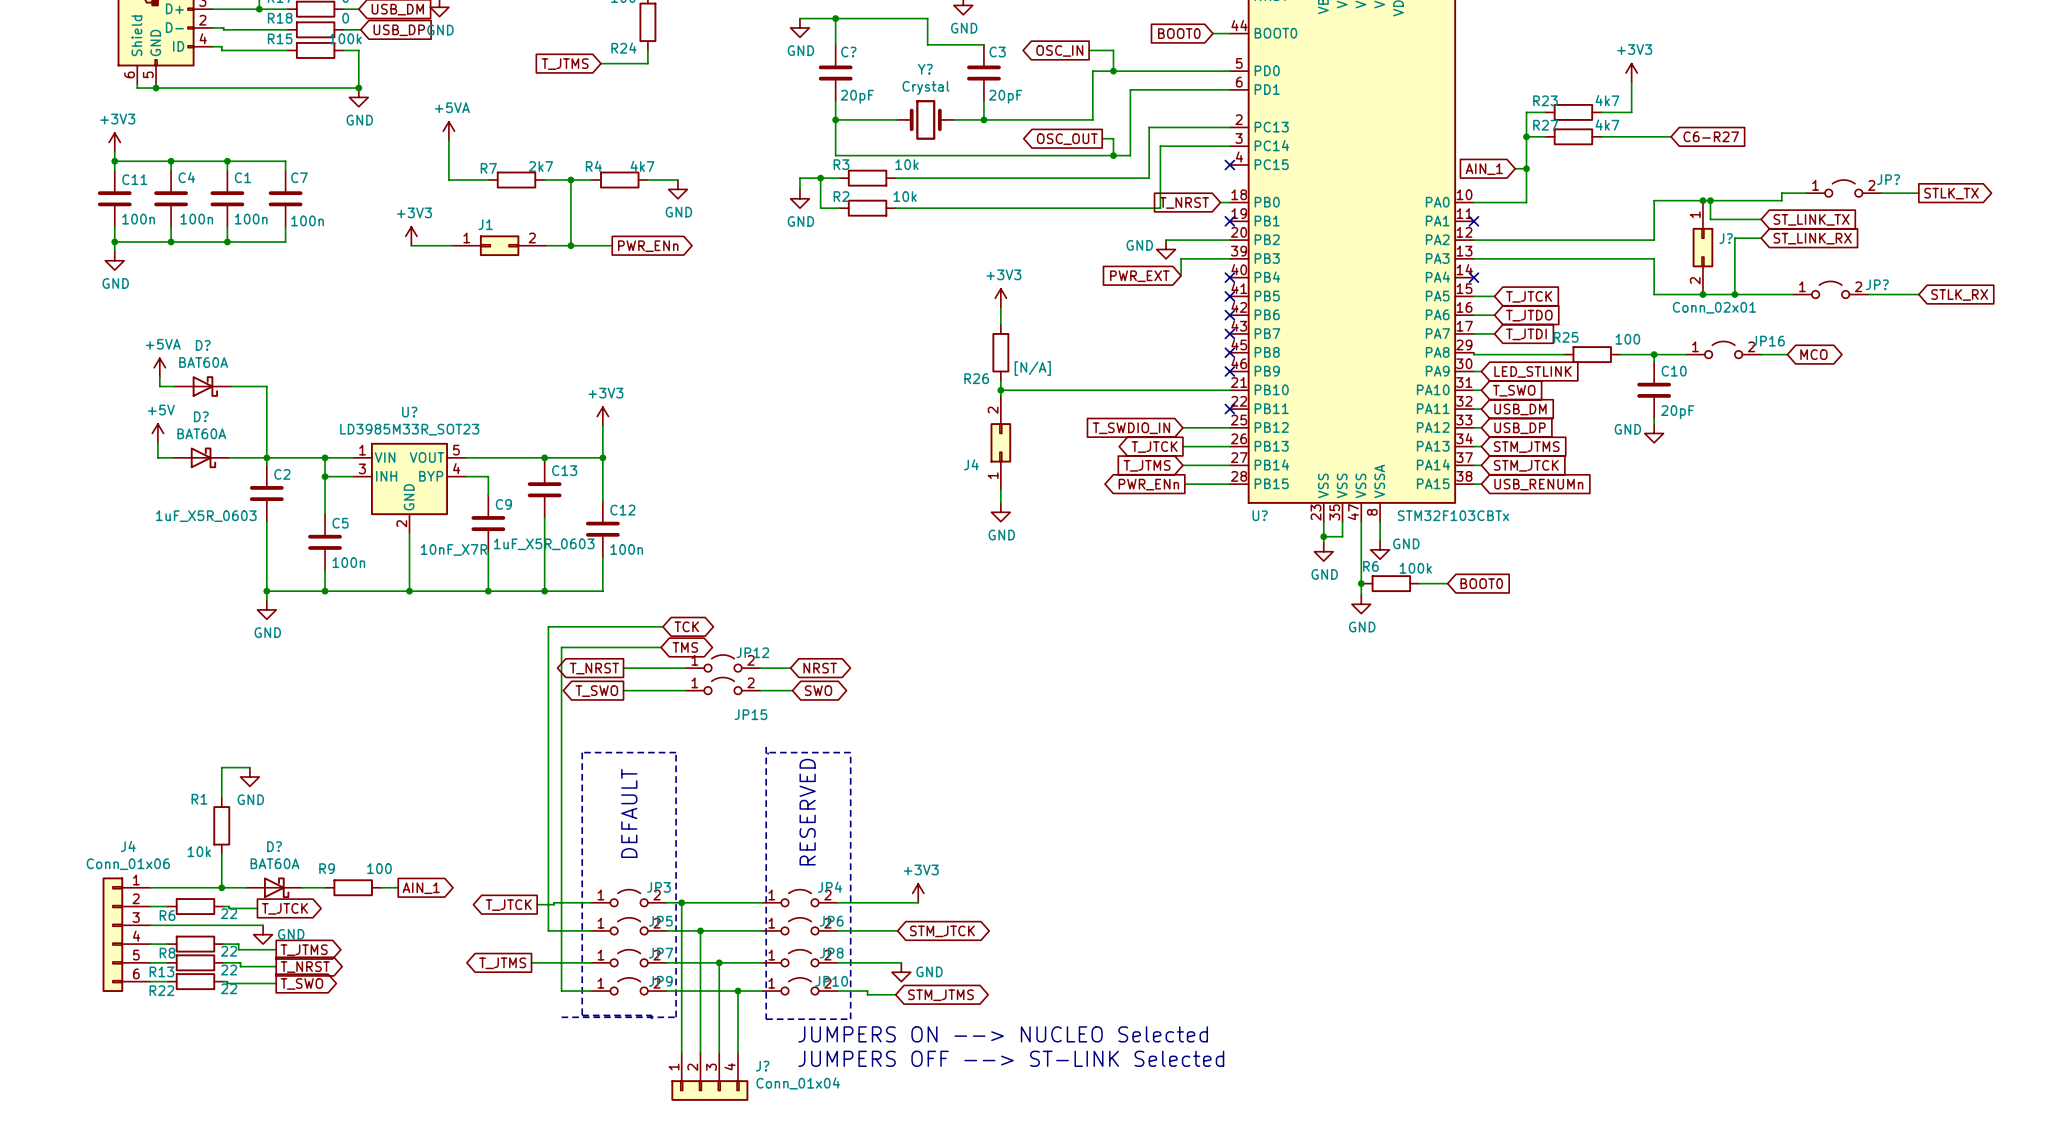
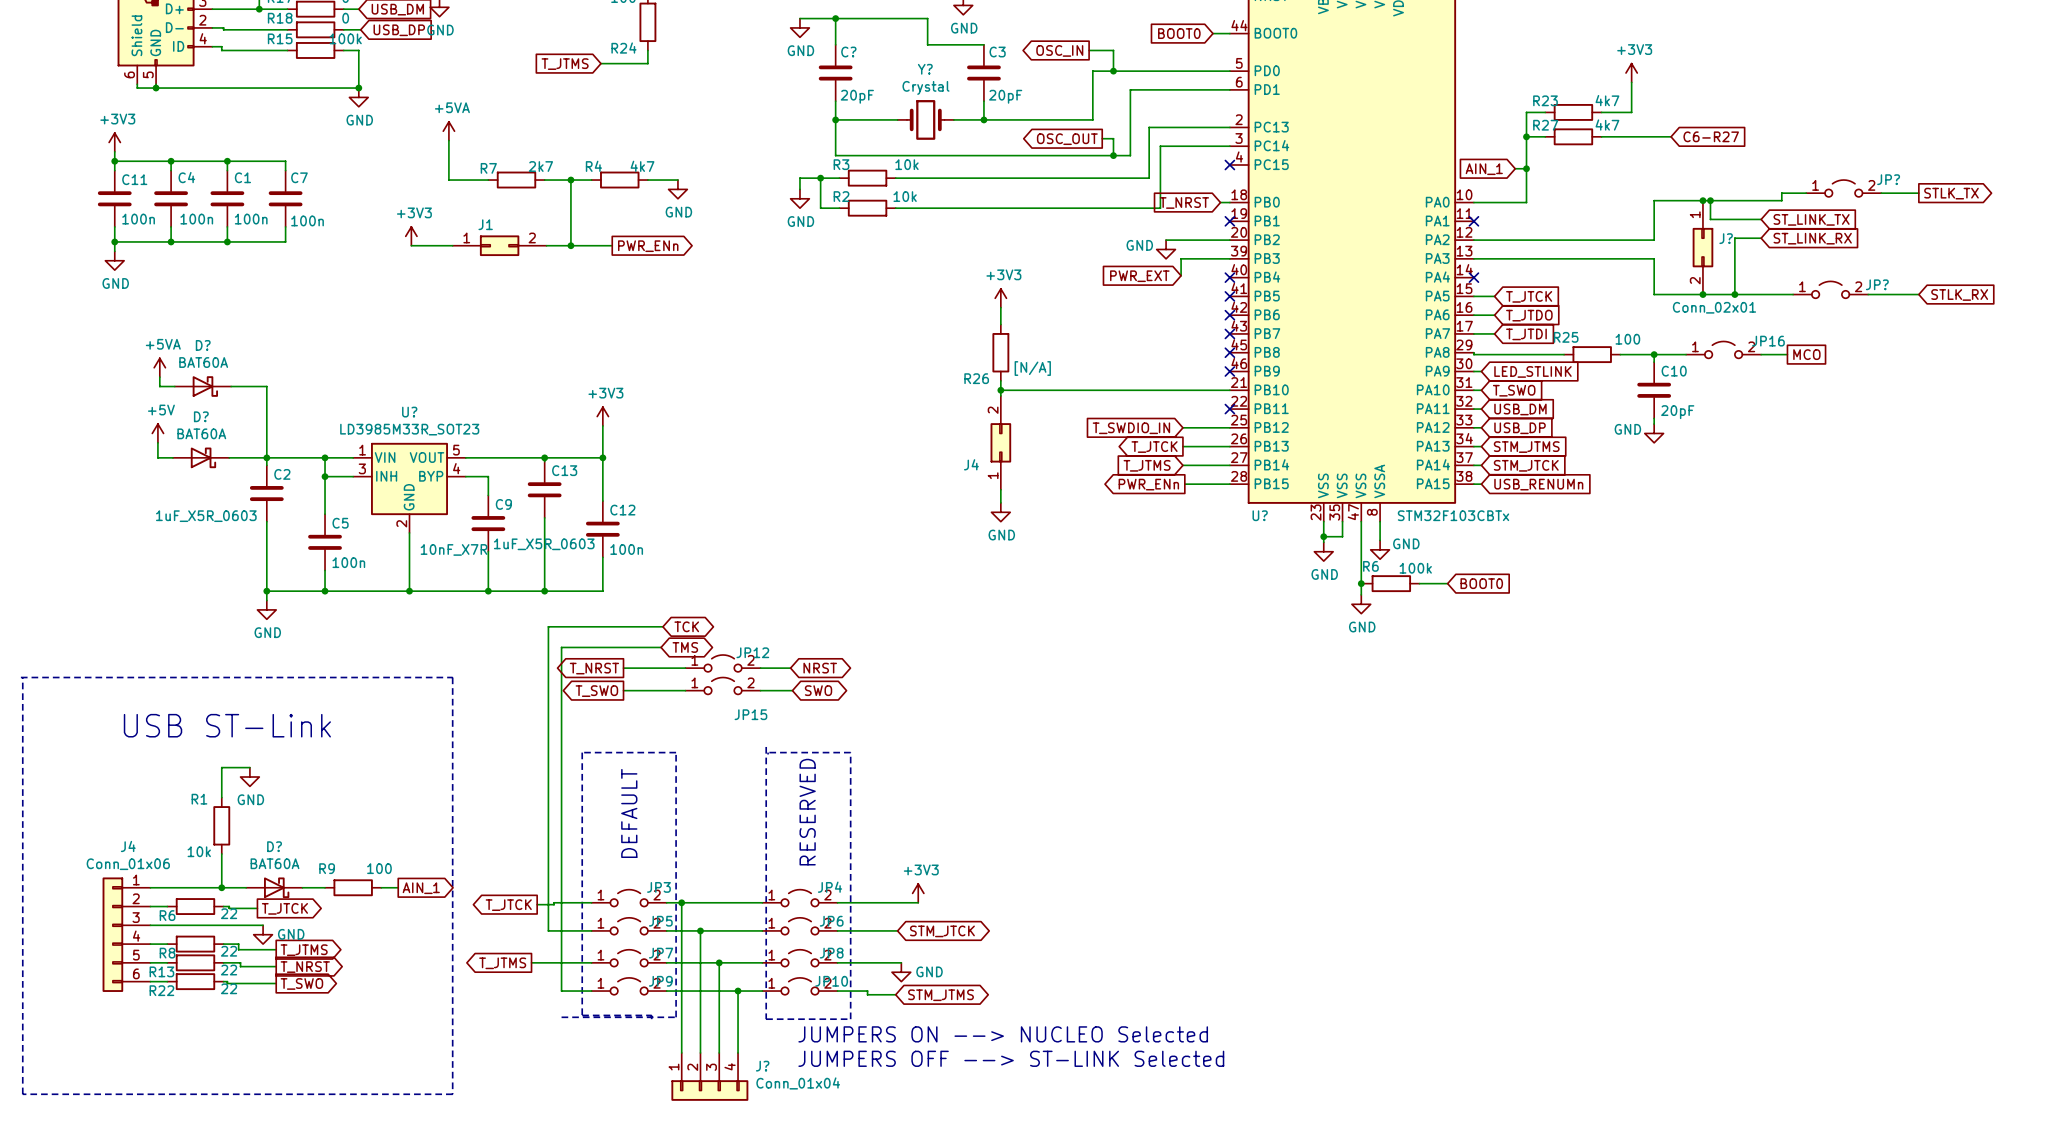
global label shape: bidirectional (1813, 354) -> passive (1806, 354)
line: none -> (20, 677) (452, 677) (452, 1094) (22, 1094) (22, 677)
text: none -> USB ST-Link (227, 725)

